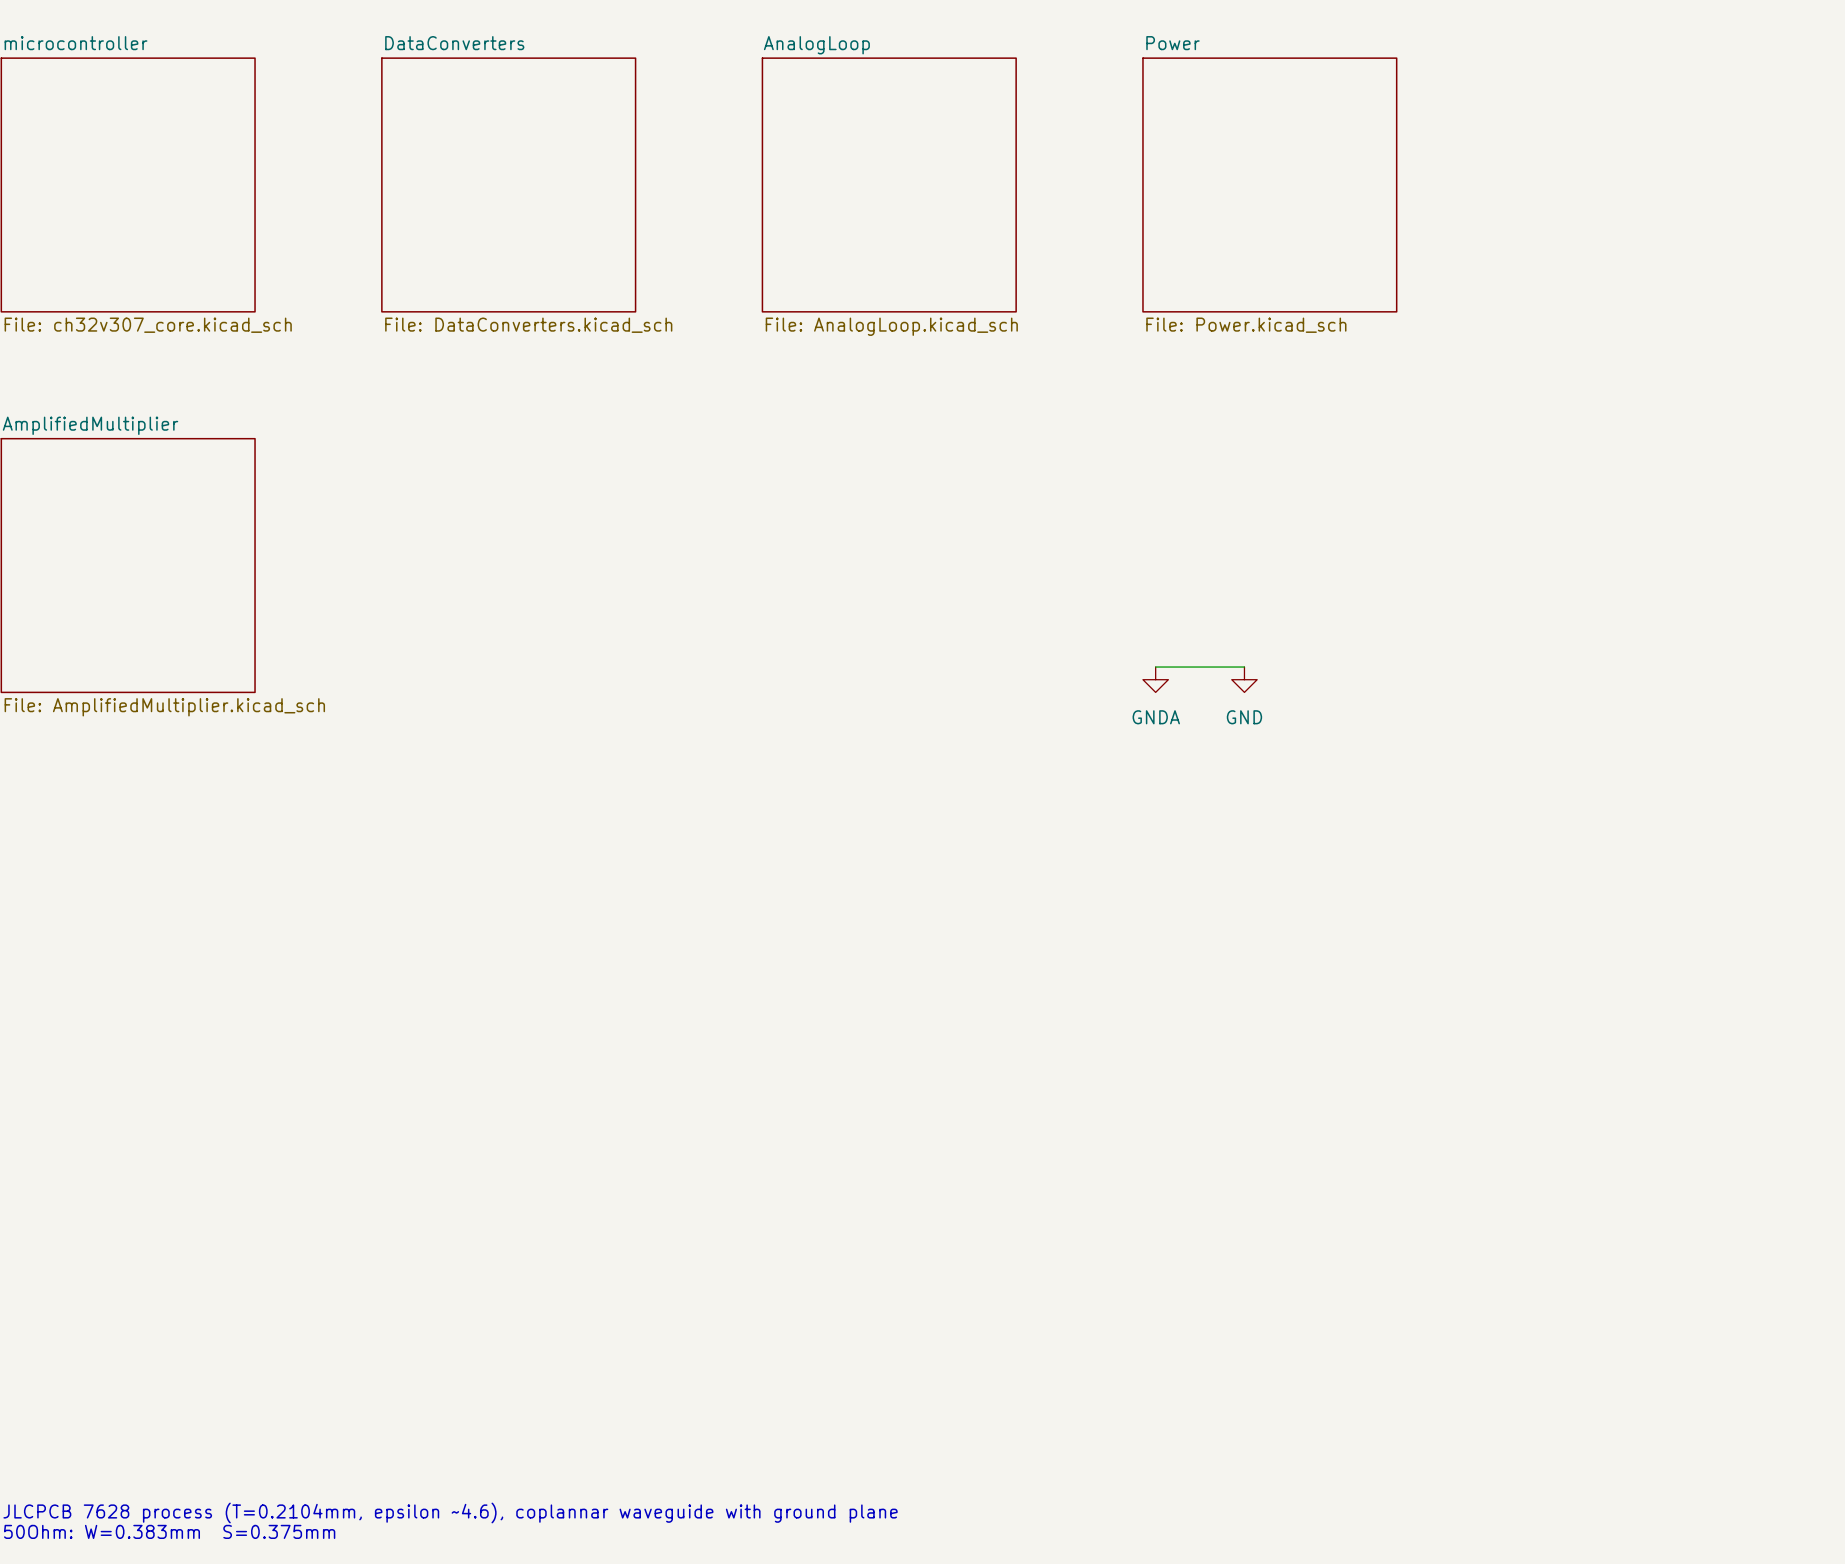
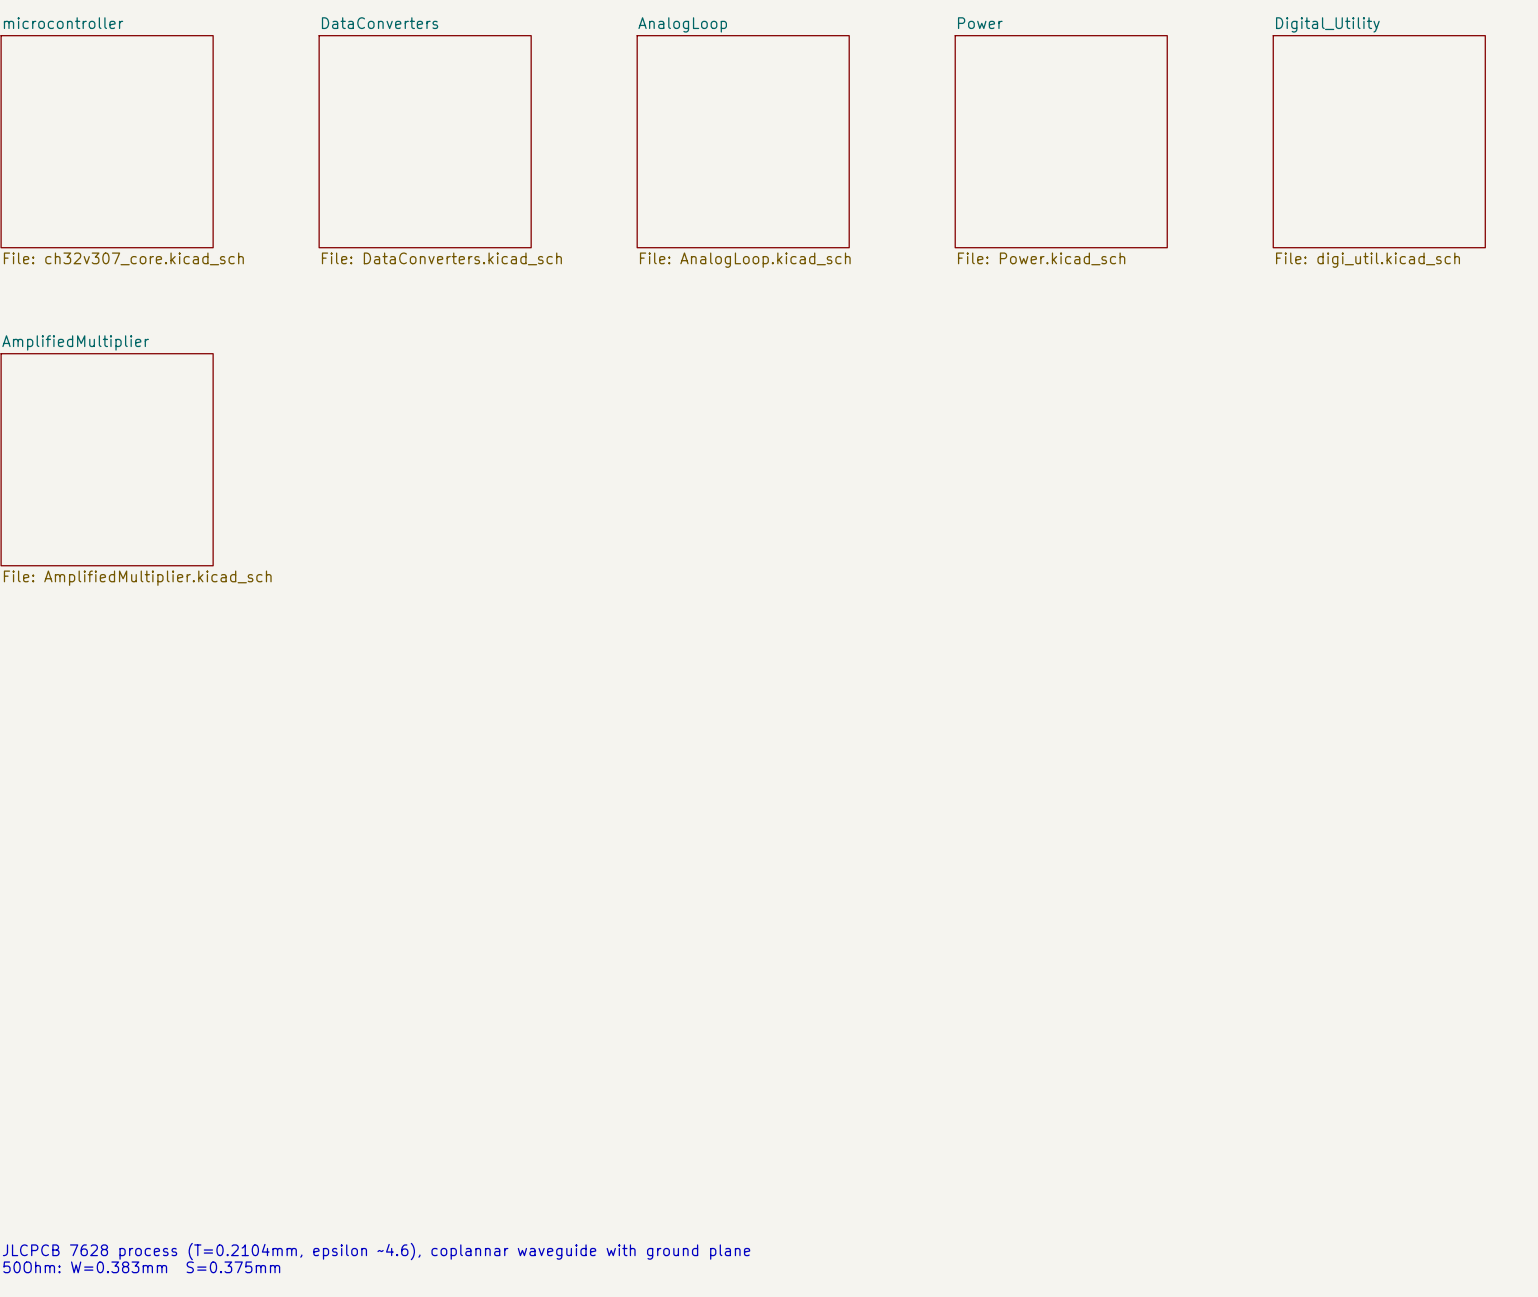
sheet Digital_Utility: none -> File: digi_util.kicad_sch (1379, 141)
wire: (1155, 667) (1244, 667) -> none
power symbol: GNDA (1155, 679) -> none
power symbol: GND (1244, 679) -> none

